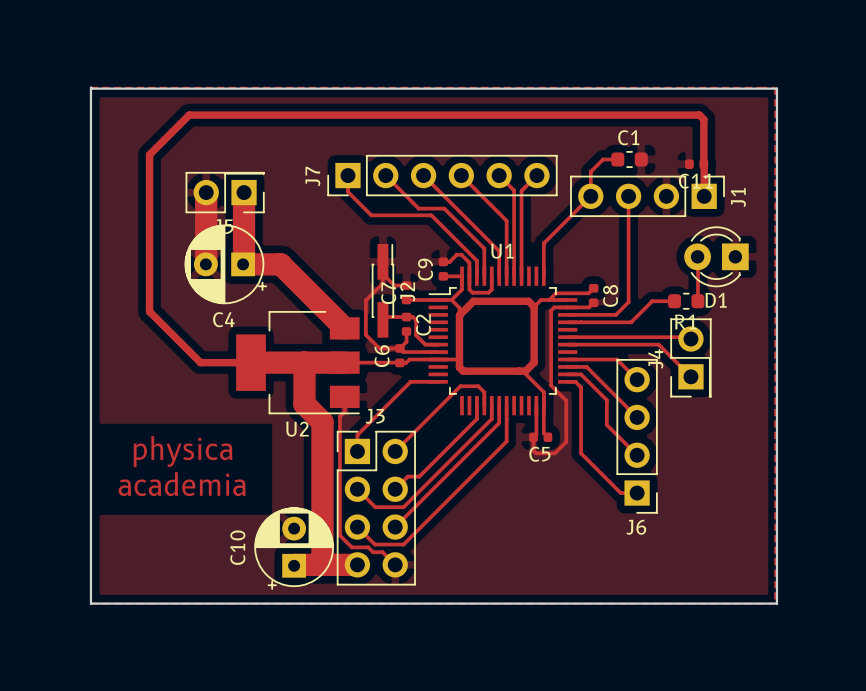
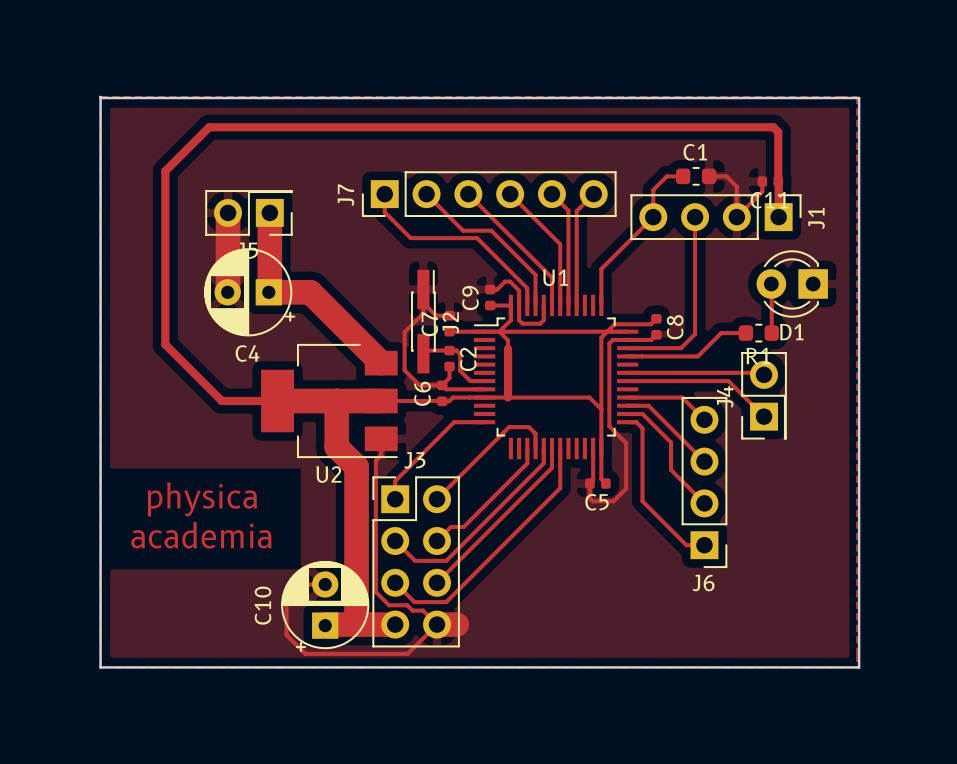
top track: none -> (709, 176) (726, 176) (736, 186) (736, 217) (762, 191) (762, 181)
top track: (541, 299) (534, 306) -> (598, 331) (499, 331)
top track: (534, 306) (534, 362) (525, 371) (463, 371) (459, 367) (459, 359) -> (601, 409) (589, 397) (508, 397)
top track: (534, 306) (528, 301) (473, 301) (459, 315) -> none
top track: (518, 371) (522, 371) (543, 392) -> (607, 331) (601, 337) (601, 433)
top track: none -> (325, 584) (297, 584) (286, 595) (286, 635) (305, 653) (407, 653) (437, 624) (456, 624)

